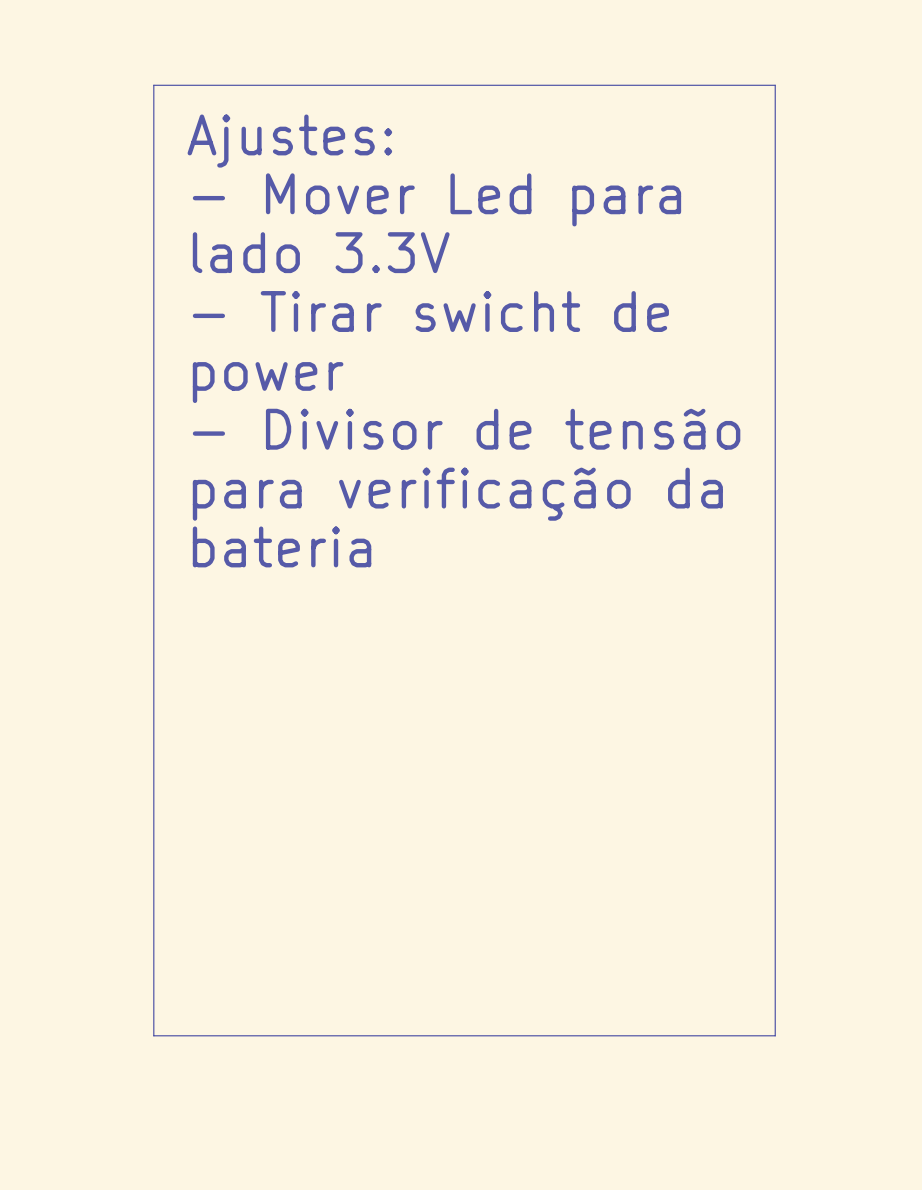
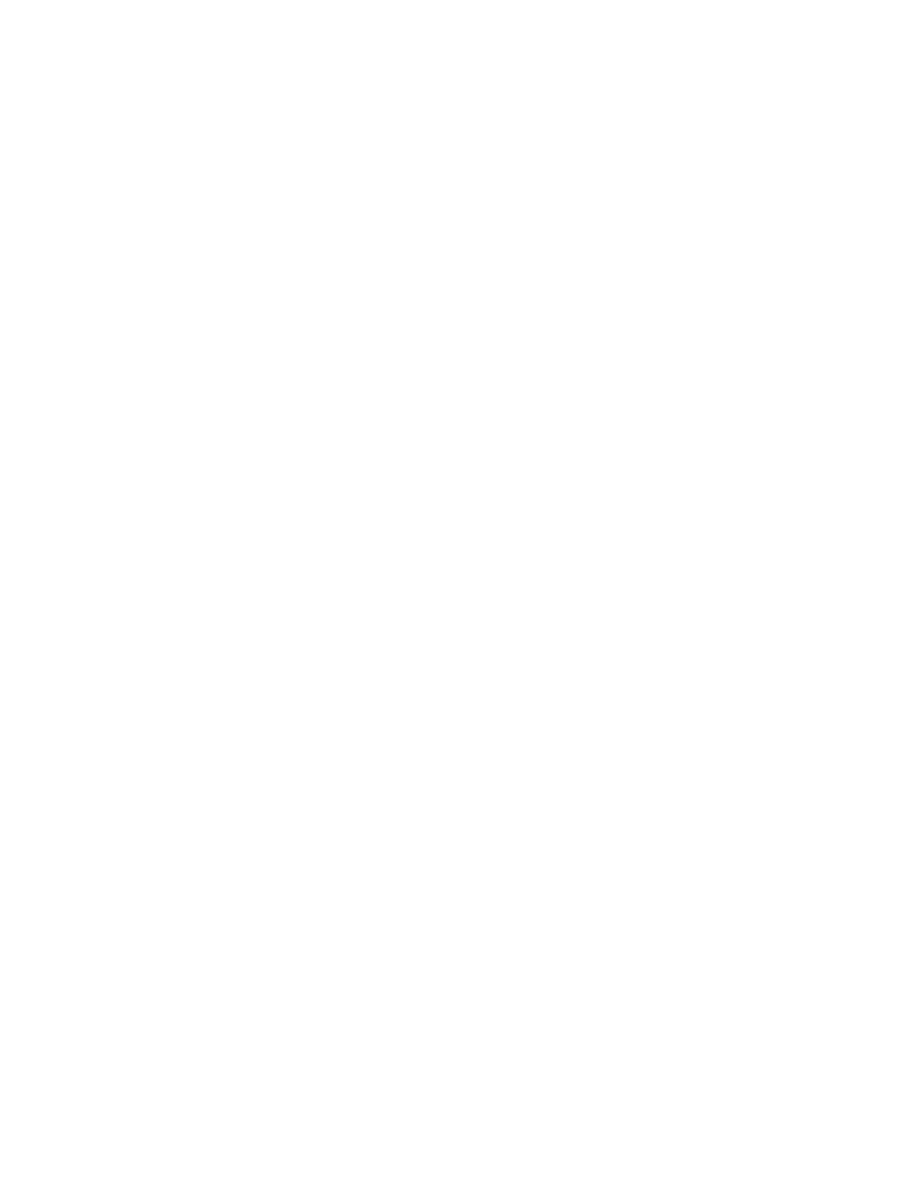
line: (153, 85) (775, 85) (775, 1035) (153, 1035) (153, 85) -> none
text: Ajustes: (289, 141) -> none
text: - Mover Led para (436, 199) -> none
text: lado 3.3V (321, 252) -> none
text: - Tirar swicht de (430, 311) -> none
text: power (268, 382) -> none
text: - Divisor de tensão (466, 429) -> none
text: para verificação da (457, 494) -> none
text: bateria (282, 546) -> none

